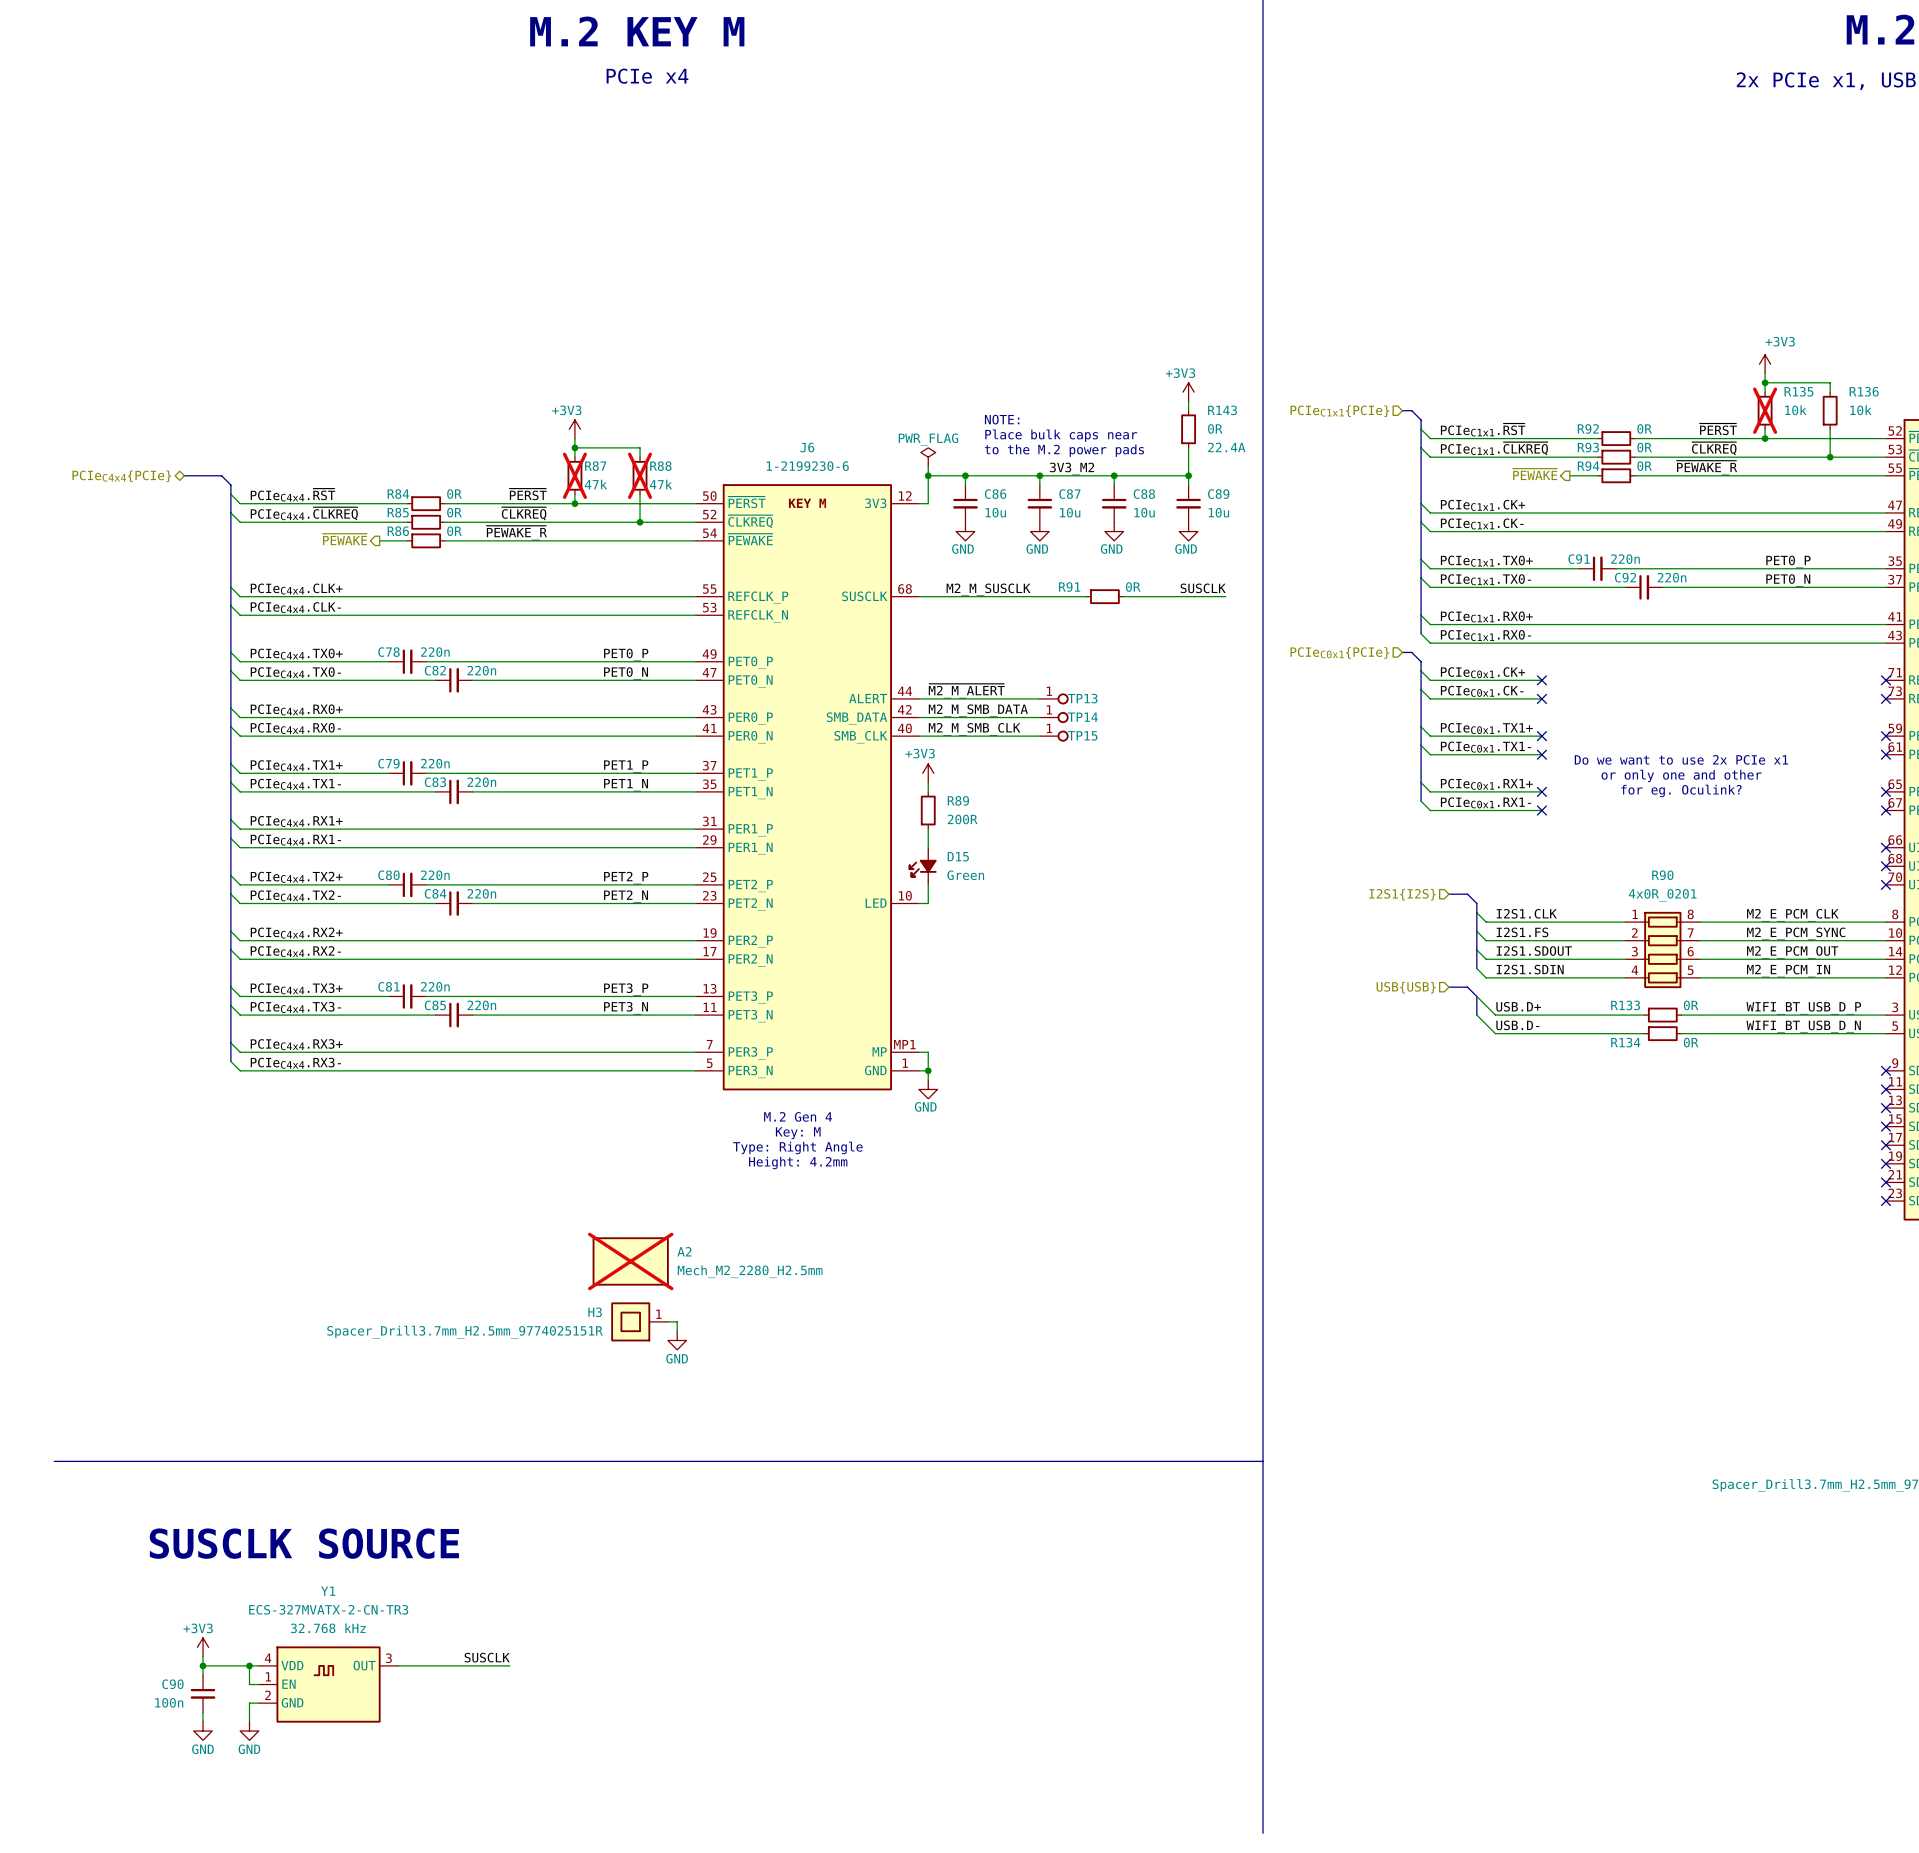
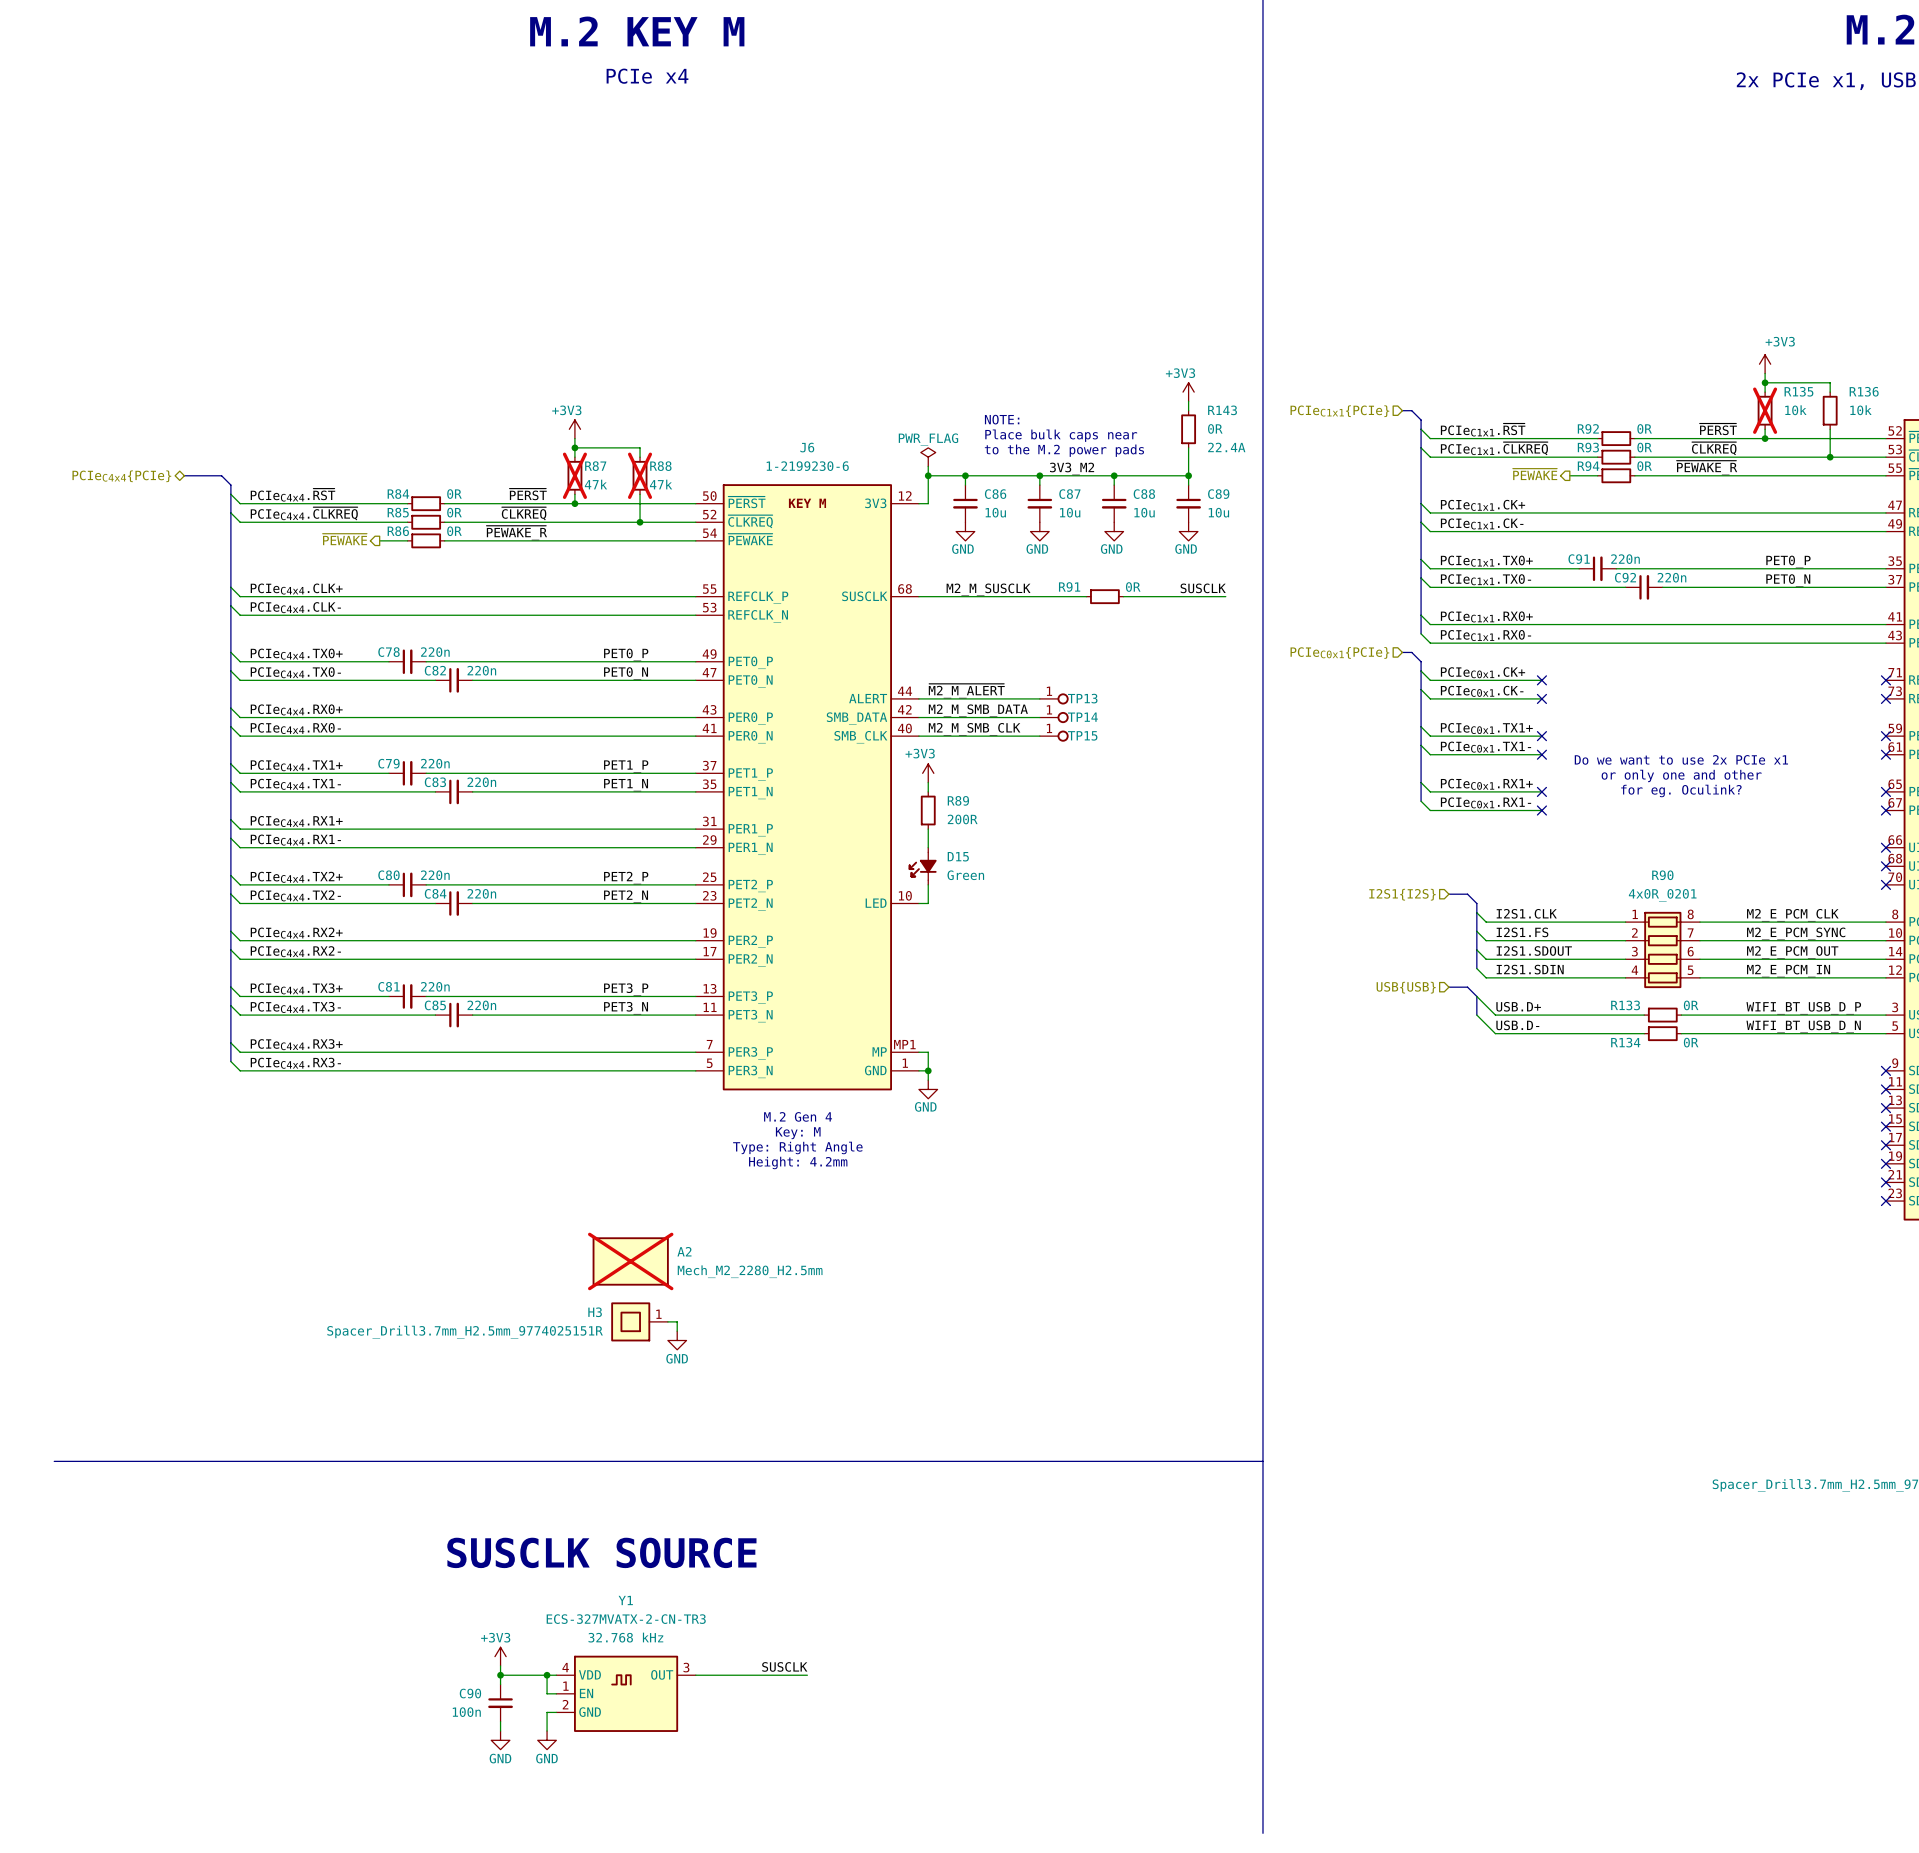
text: SUSCLK SOURCE (304, 1543) -> none
text: none -> SUSCLK SOURCE (601, 1552)
power symbol: +3V3 (203, 1647) -> none
wire: (203, 1656) (203, 1675) -> none
power symbol: none -> +3V3 (500, 1656)
label: SUSCLK (487, 1657) -> none
wire: (203, 1665) (258, 1665) -> none
junction: (203, 1665) -> none
wire: (249, 1665) (249, 1684) (258, 1684) -> none
junction: (249, 1665) -> none
wire: (398, 1665) (509, 1665) -> none
wire: none -> (500, 1665) (500, 1684)
label: none -> SUSCLK (784, 1666)
wire: none -> (500, 1675) (556, 1675)
junction: none -> (500, 1675)
wire: none -> (547, 1675) (547, 1693) (556, 1693)
junction: none -> (547, 1675)
wire: none -> (695, 1675) (807, 1675)
Y1 position: (328, 1684) -> (626, 1693)
C90 position: (203, 1693) -> (500, 1703)
wire: (258, 1703) (249, 1703) (249, 1721) -> none
wire: (203, 1712) (203, 1721) -> none
wire: none -> (556, 1712) (547, 1712) (547, 1731)
wire: none -> (500, 1721) (500, 1731)
power symbol: GND (203, 1731) -> none
power symbol: GND (249, 1731) -> none
power symbol: none -> GND (500, 1740)
power symbol: none -> GND (547, 1740)

